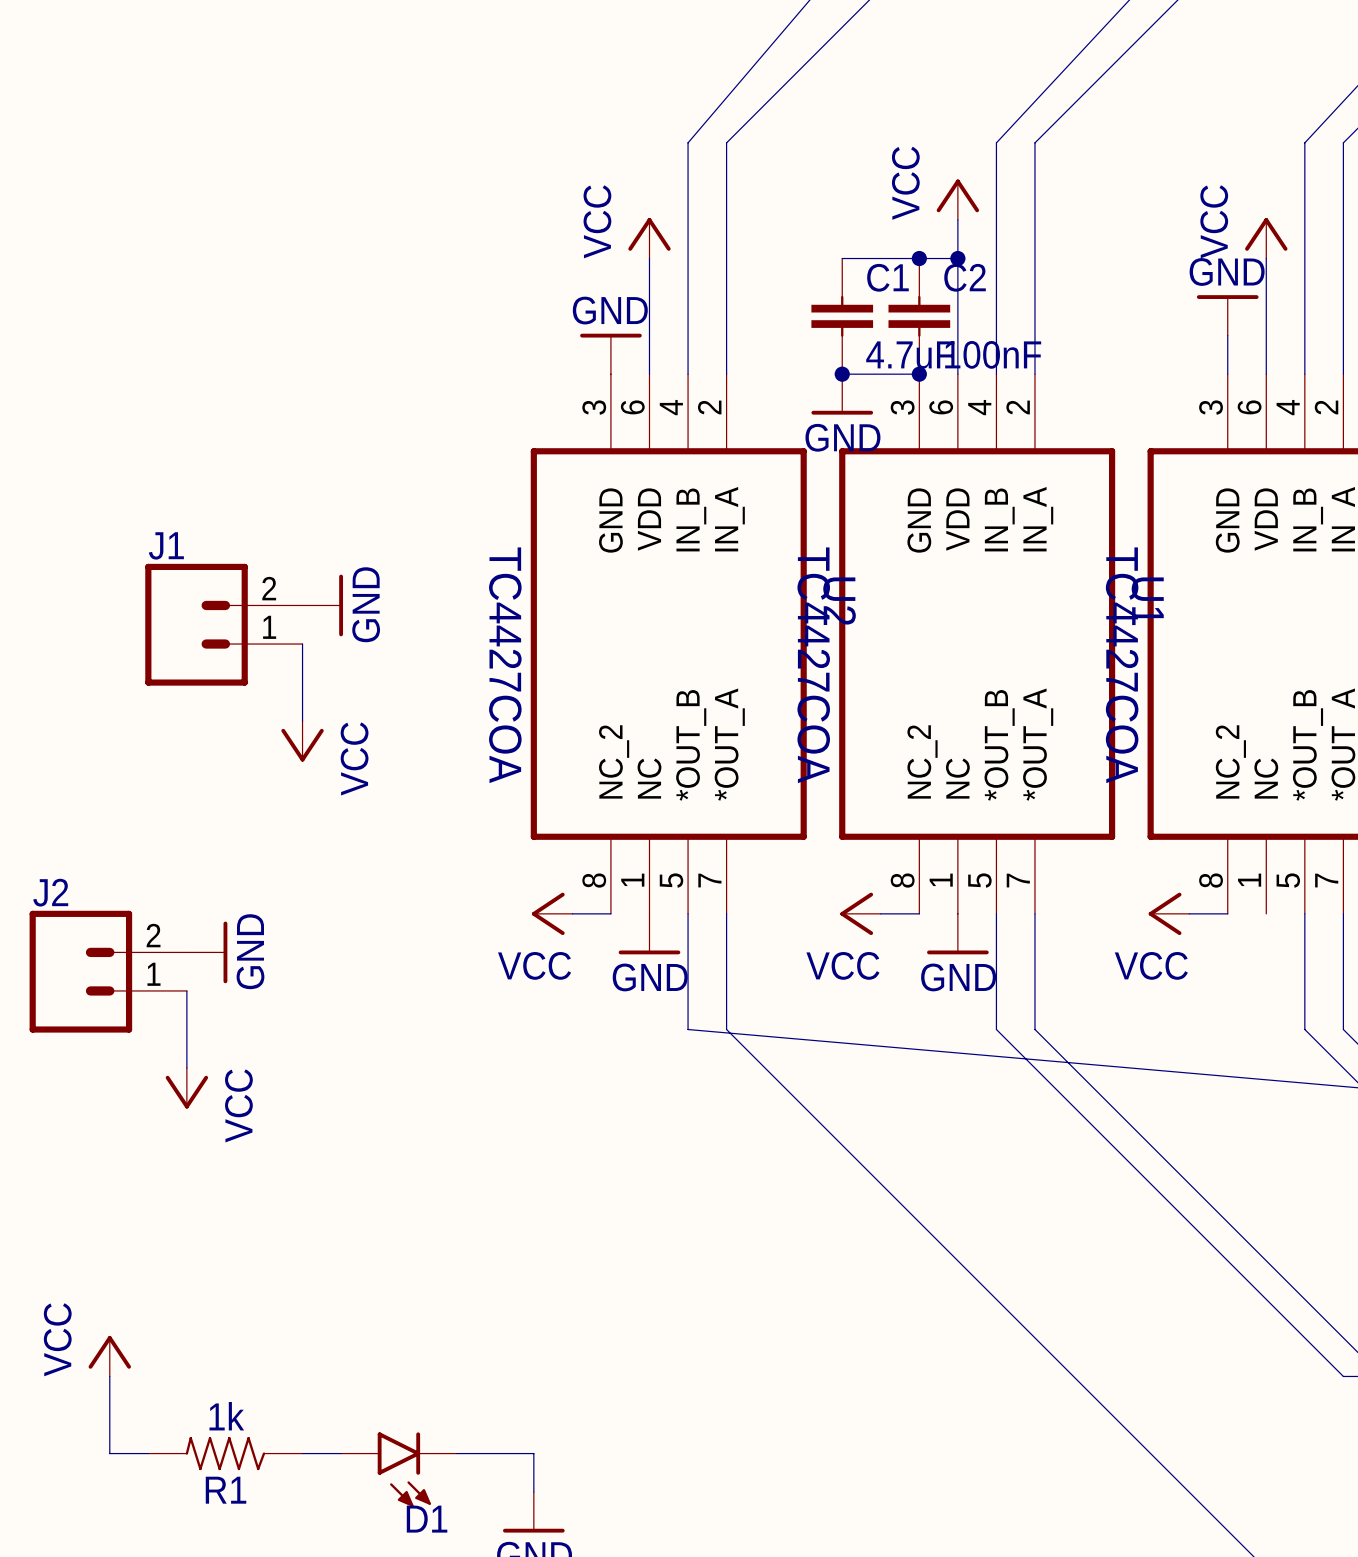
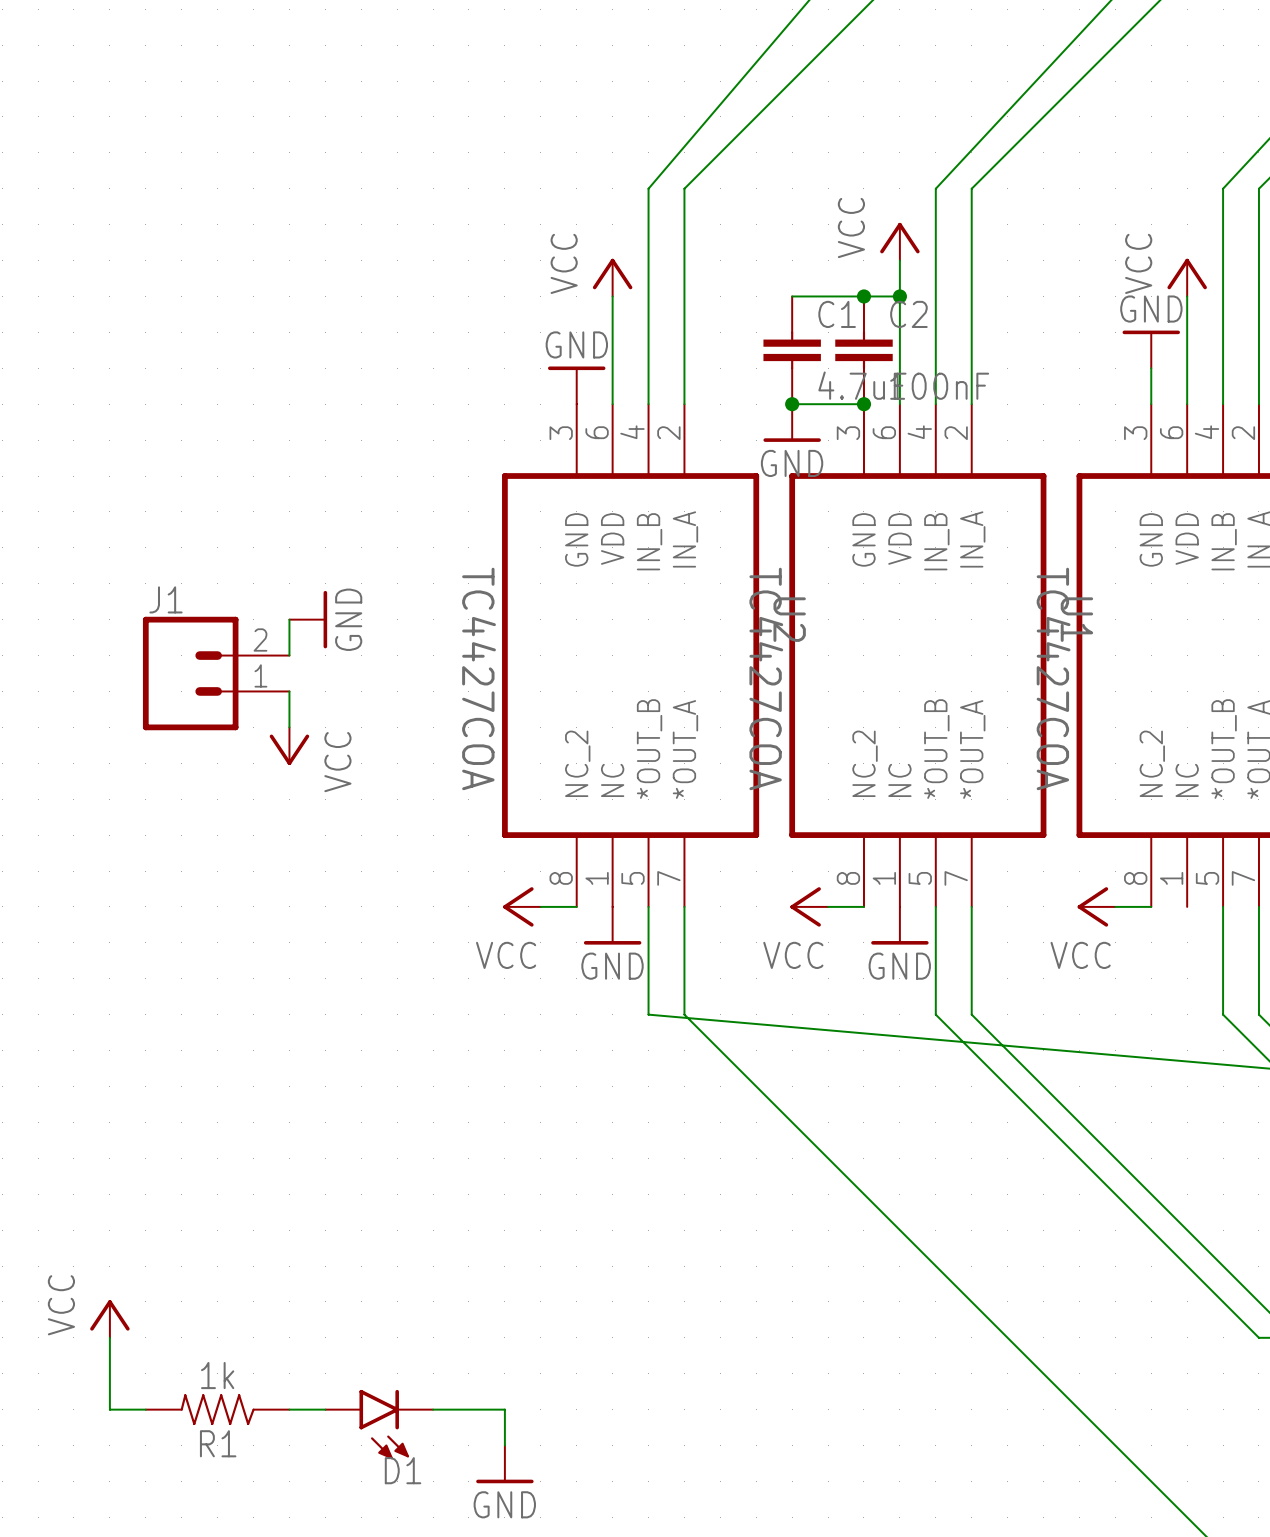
J1 position: (223, 624) -> (216, 673)
wire: (302, 644) (302, 682) -> (289, 655) (289, 619)
power symbol: GND (207, 952) -> none
J2: (108, 971) -> none
wire: (186, 990) (186, 1068) -> none
power symbol: VCC (186, 1088) -> none

